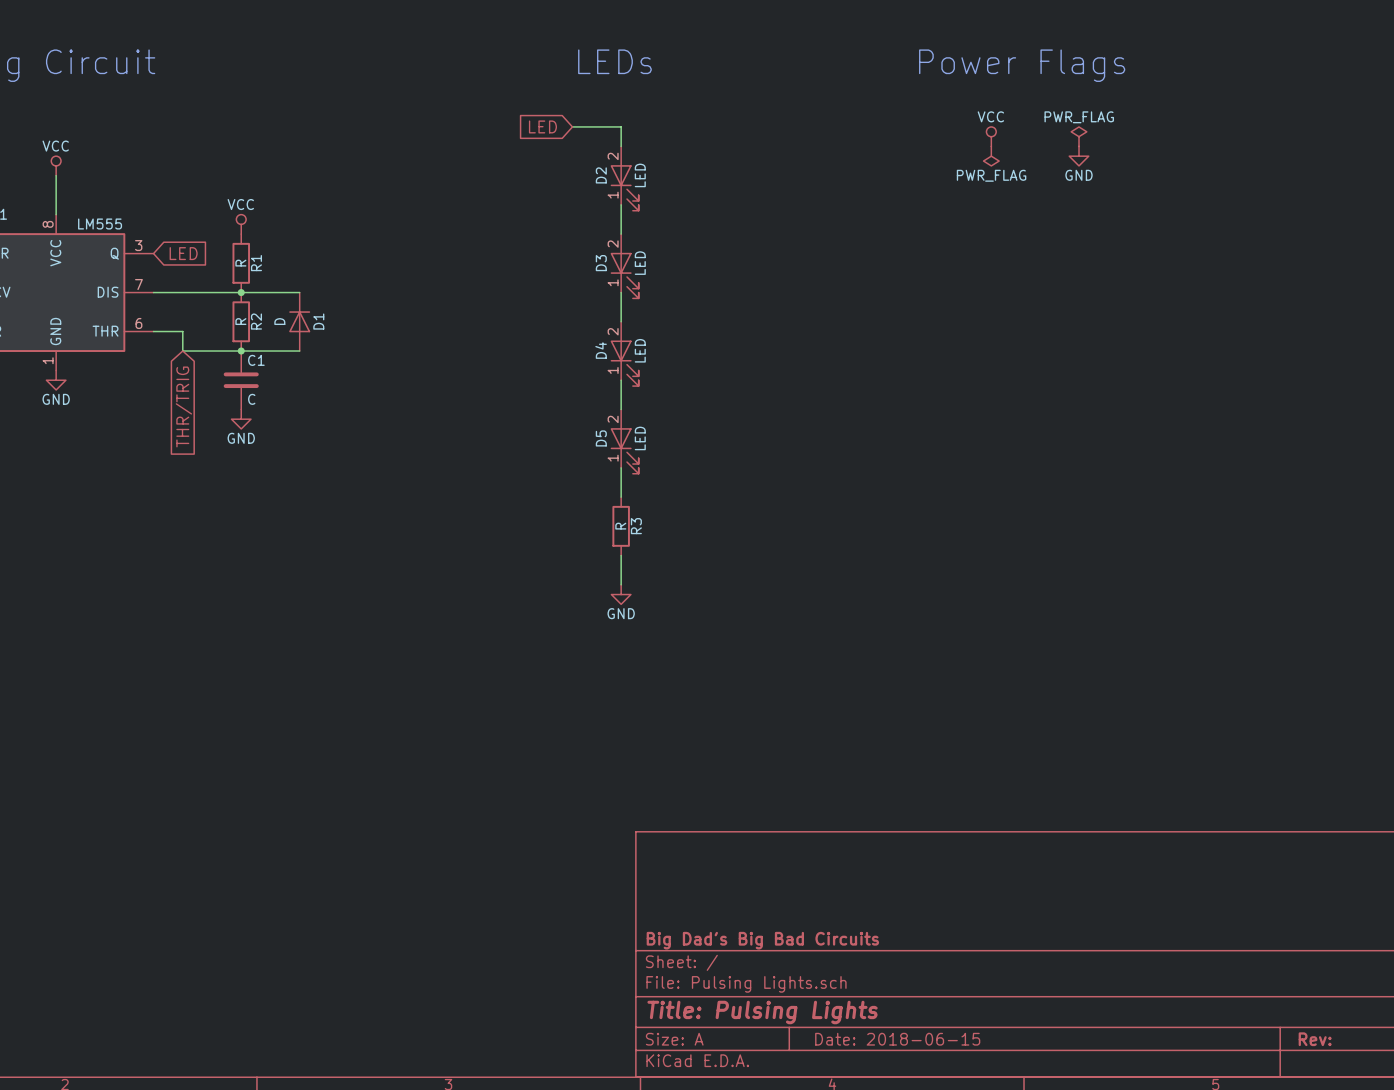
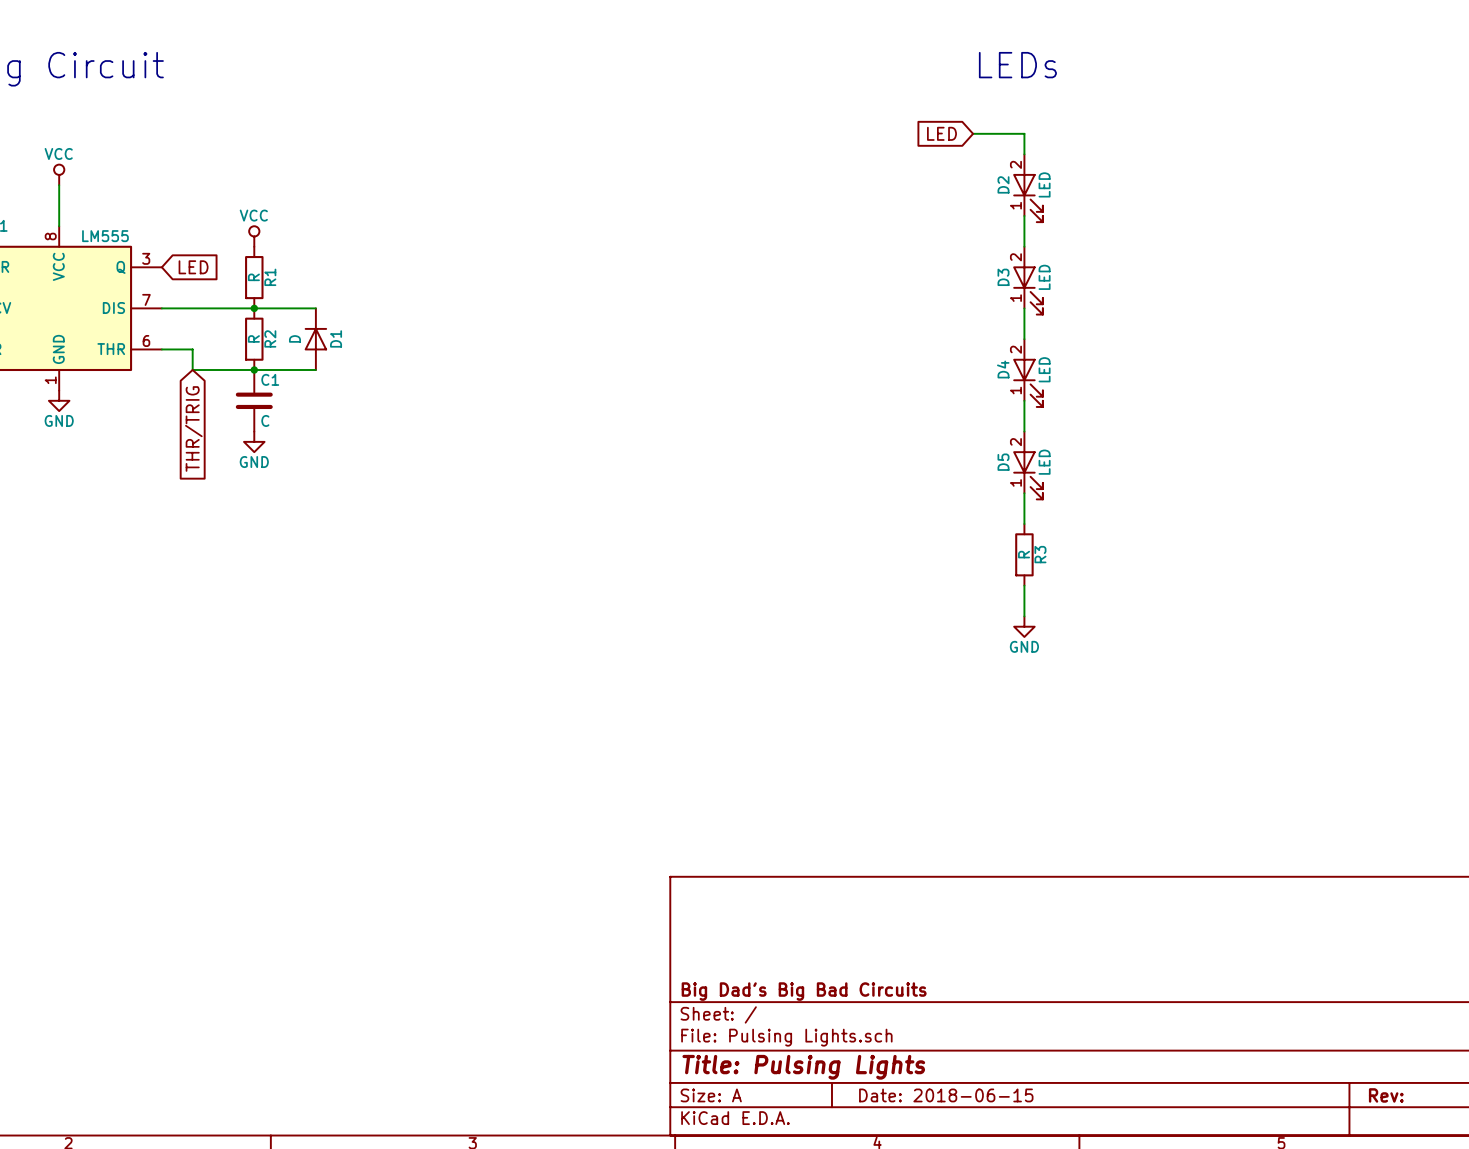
text: LEDs (614, 61) -> none
text: none -> LEDs (1017, 65)
text: Power Flags (1022, 65) -> none
global label: LED (542, 126) -> none
wire: (572, 126) (621, 126) (621, 146) -> none
global label: none -> LED (941, 133)
wire: none -> (973, 133) (1024, 133) (1024, 154)
power symbol: VCC (991, 136) -> none
power symbol: PWR_FLAG (1079, 136) -> none
power symbol: PWR_FLAG (991, 156) -> none
power symbol: GND (1079, 156) -> none
D2 position: (624, 178) -> (1028, 188)
wire: (621, 204) (621, 234) -> none
wire: none -> (1024, 215) (1024, 246)
D3 position: (624, 266) -> (1028, 280)
wire: (621, 292) (621, 321) -> none
wire: none -> (1024, 308) (1024, 339)
D4 position: (624, 353) -> (1028, 373)
wire: (621, 380) (621, 409) -> none
wire: none -> (1024, 400) (1024, 431)
D5 position: (624, 441) -> (1028, 465)
wire: (621, 467) (621, 497) -> none
wire: none -> (1024, 493) (1024, 524)
R3 position: (621, 526) -> (1024, 554)
wire: (621, 555) (621, 584) -> none
wire: none -> (1024, 585) (1024, 616)
power symbol: GND (621, 594) -> none
power symbol: none -> GND (1024, 626)

